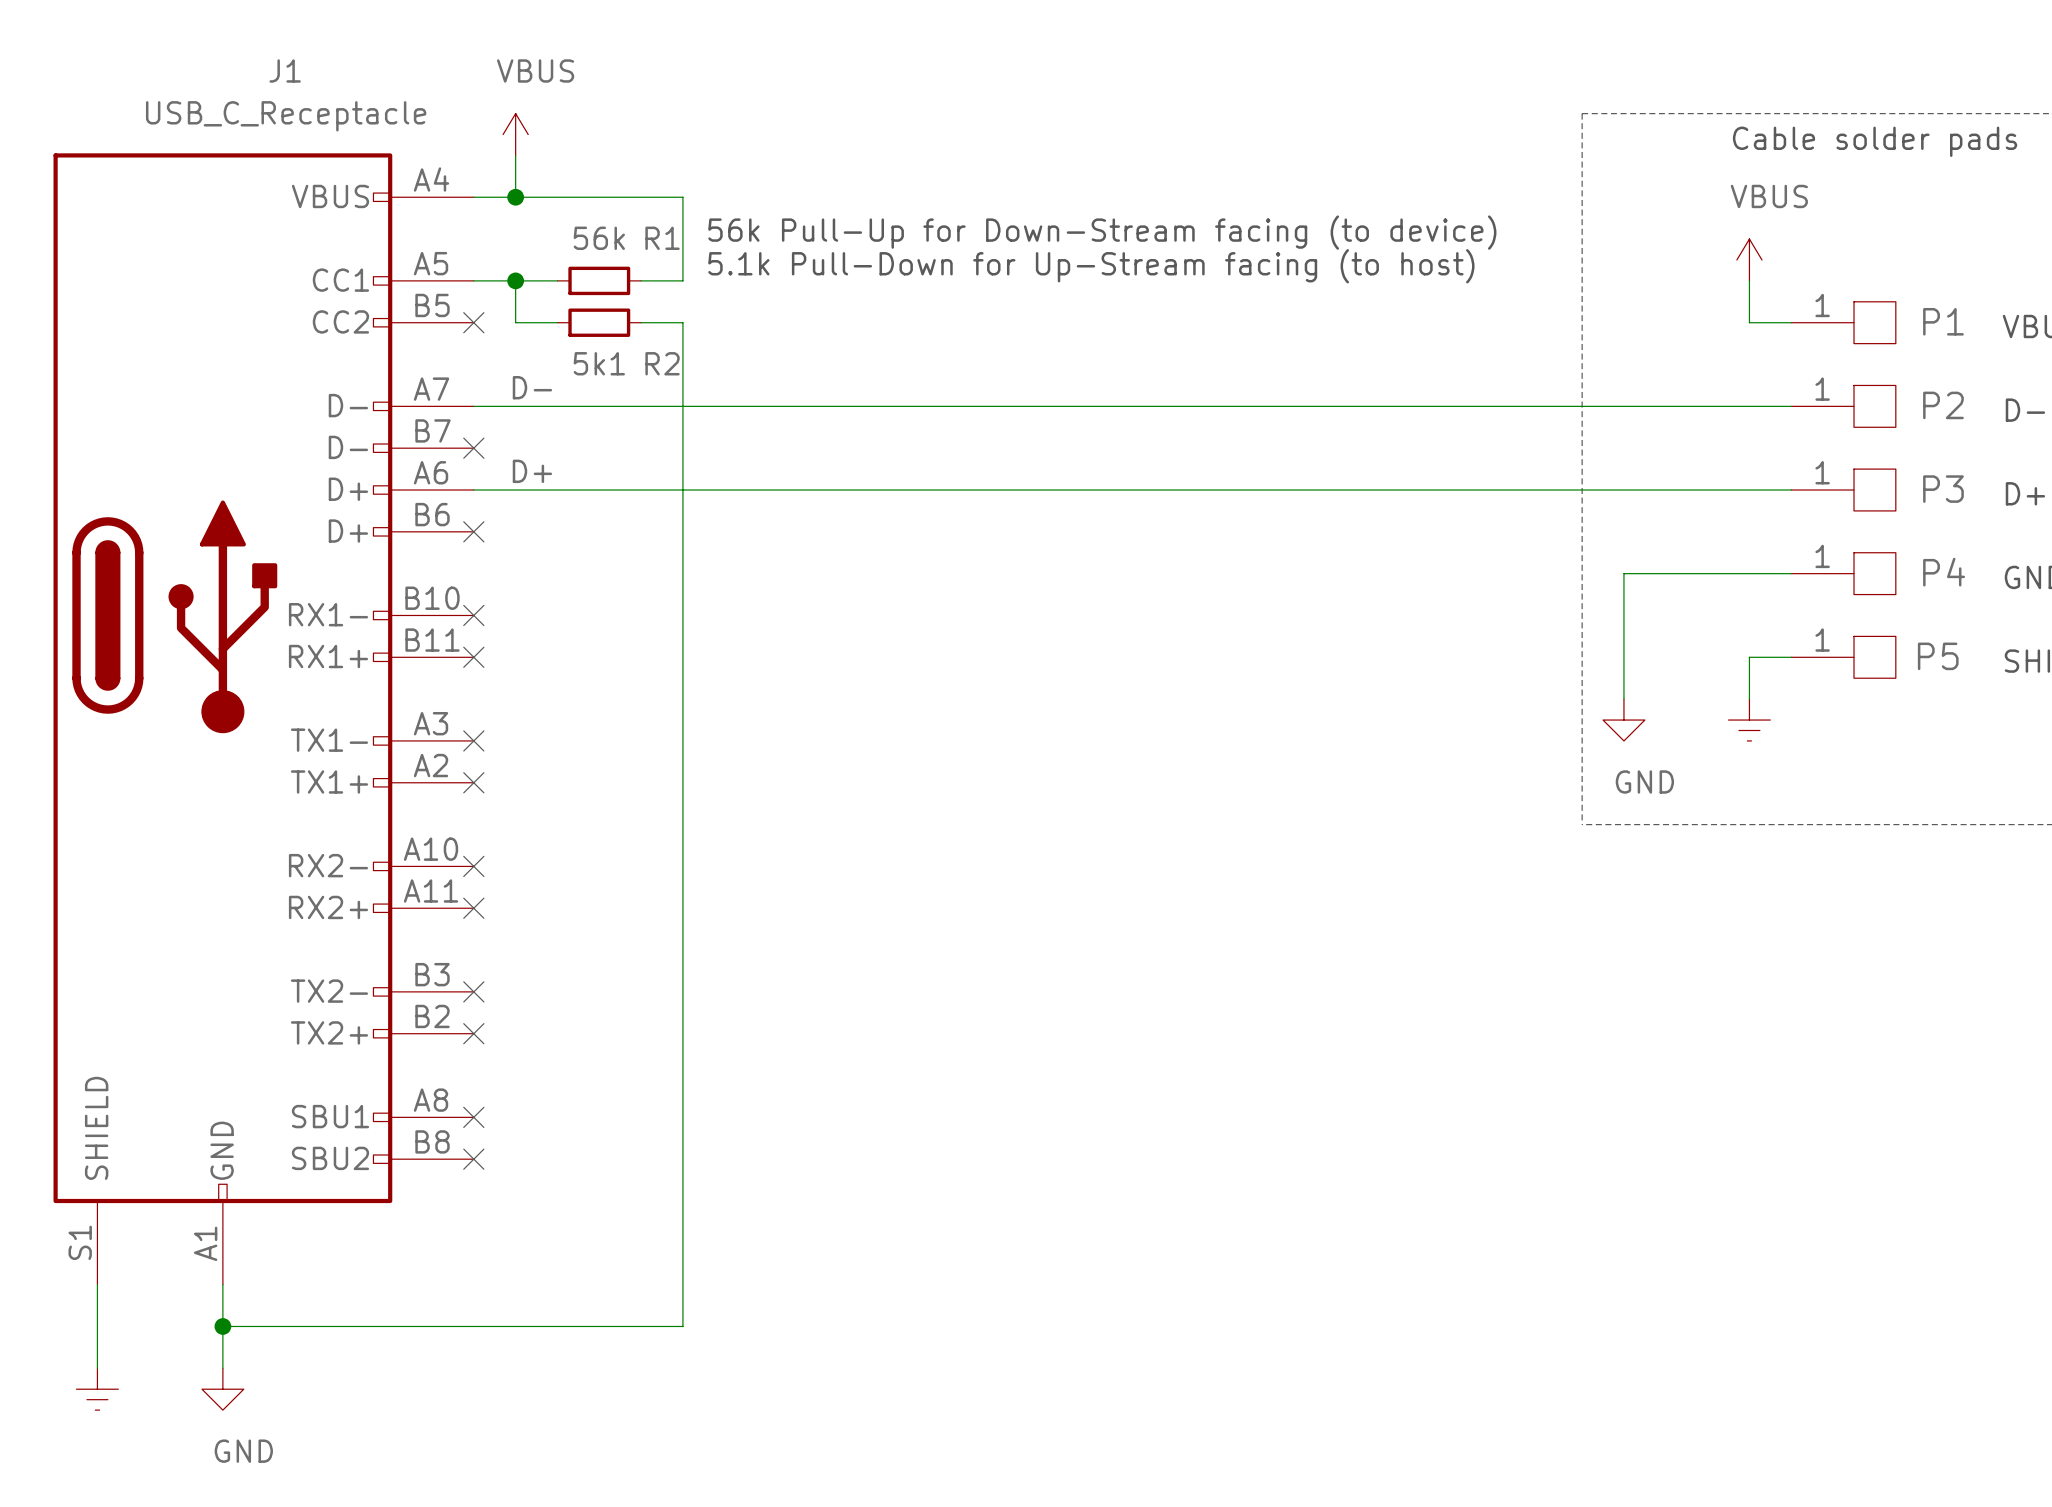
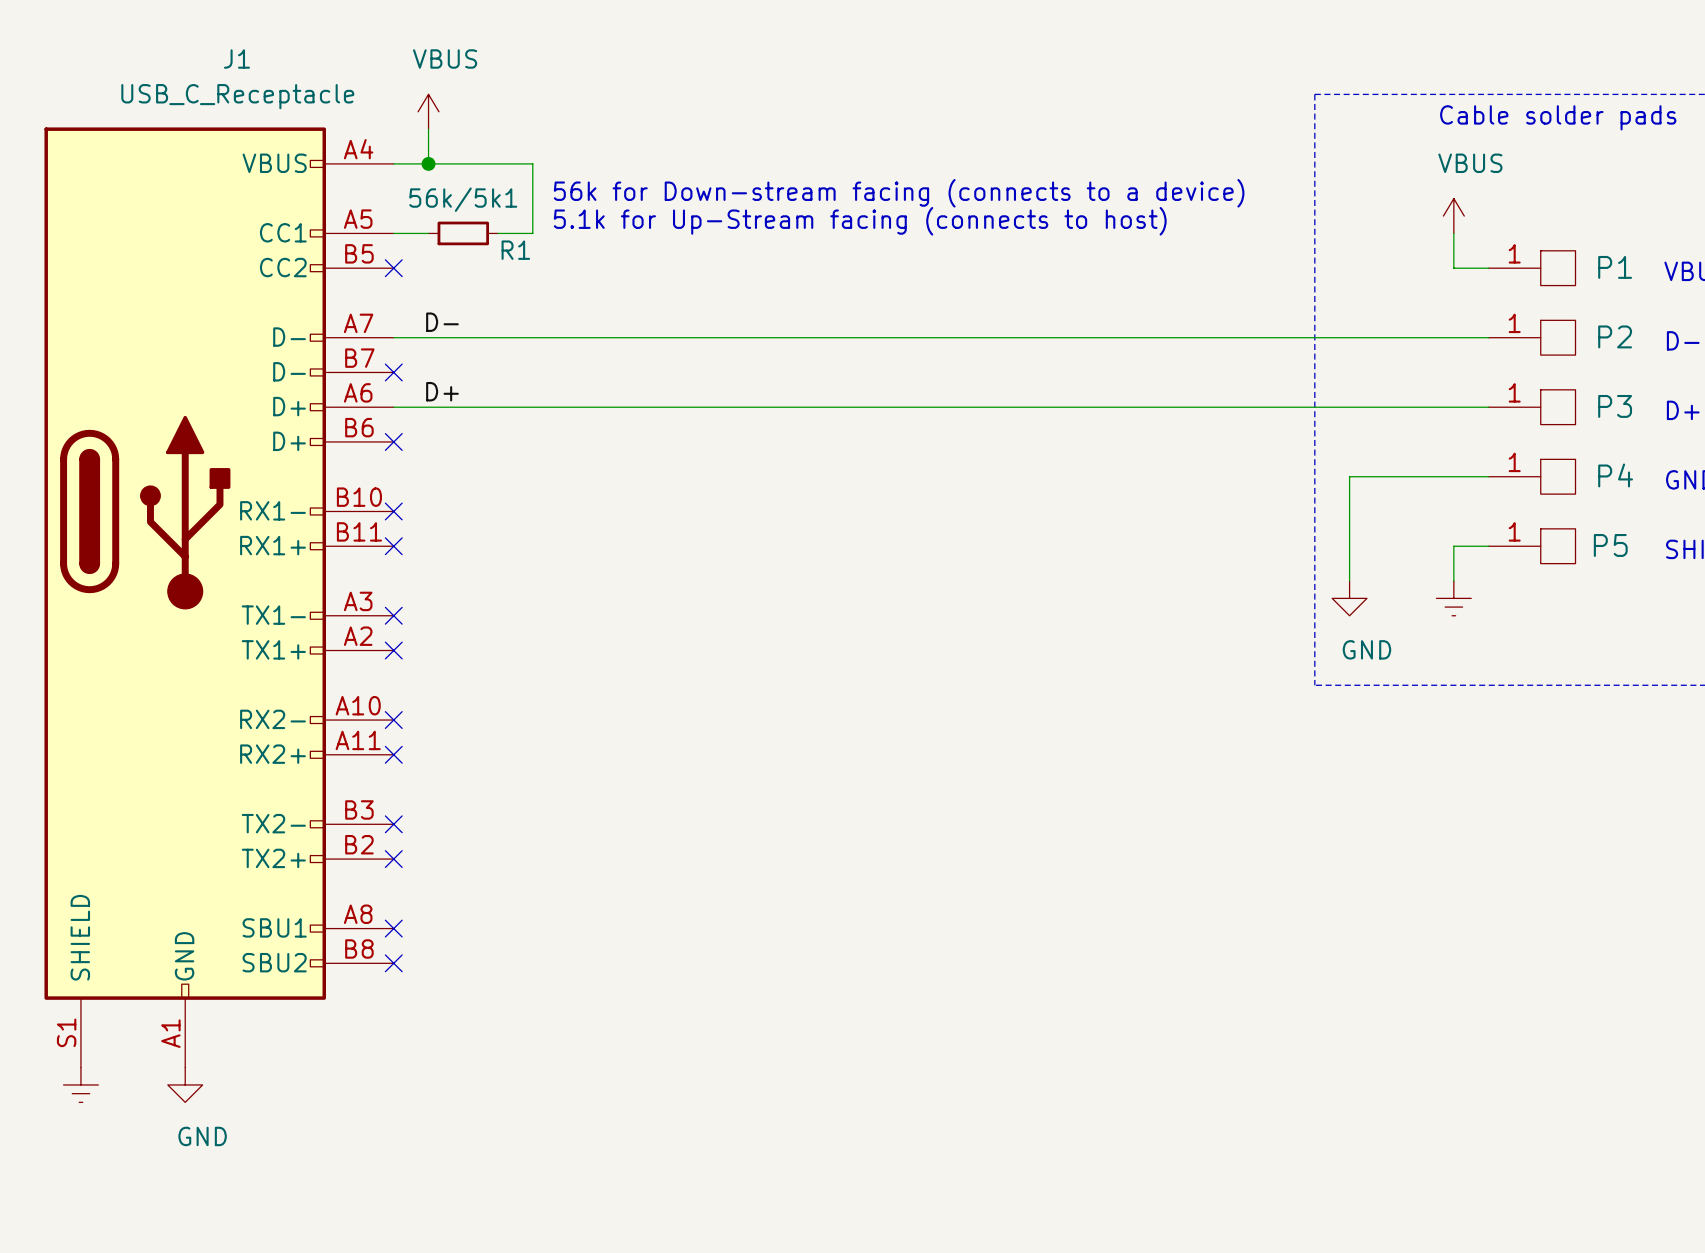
wire: (641, 197) (682, 197) (682, 280) (641, 280) -> (532, 163) (532, 233) (498, 233)
text: 56k Pull-Up for Down-Stream facing (to device) (1102, 232) -> 56k for Down-stream facing (connects to a device) (899, 193)
R1 value: 56k (599, 238) -> 56k/5k1 (463, 199)
R1 name position: R1 (662, 238) -> R1 (515, 250)
text: 5.1k Pull-Down for Up-Stream facing (to host) (1091, 266) -> 5.1k for Up-Stream facing (connects to host) (860, 221)
junction: (515, 280) -> none
wire: (557, 280) (515, 280) (515, 322) (557, 322) -> none
R1 position: (599, 280) -> (463, 233)
R2: 5k1 (599, 322) -> none
wire: (641, 322) (682, 322) (682, 1326) (222, 1326) -> none
wire: (97, 1284) (97, 1368) -> none
wire: (222, 1284) (222, 1368) -> none
junction: (222, 1326) -> none
power symbol position: (97, 1389) -> (80, 1084)
power symbol position: GND (222, 1389) -> GND (185, 1084)

